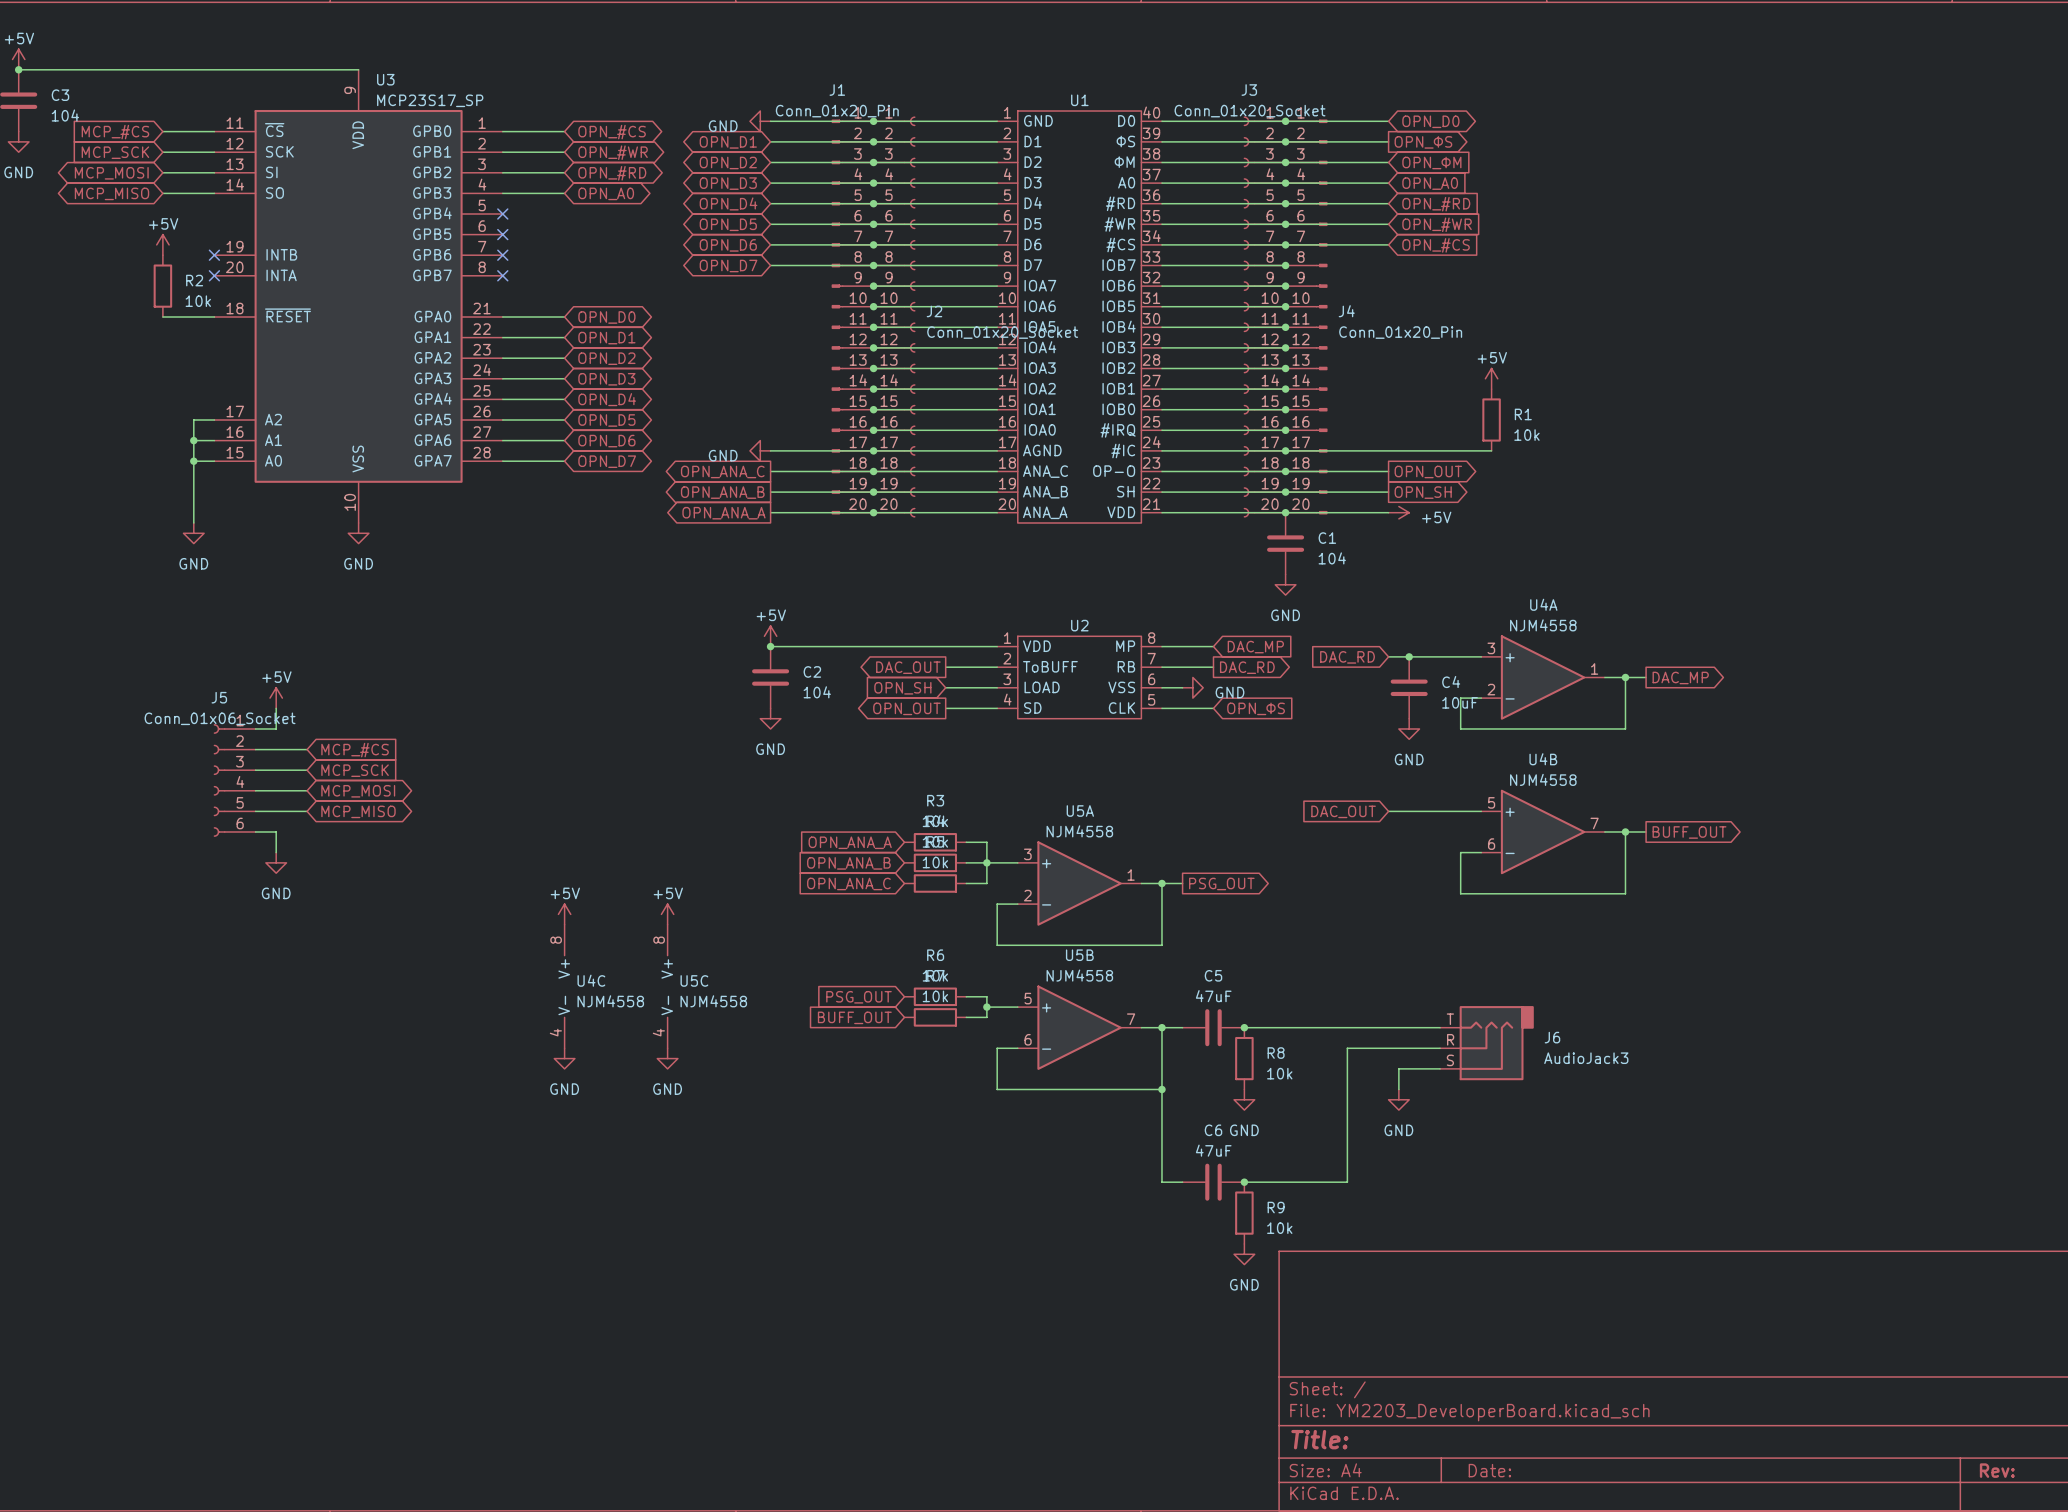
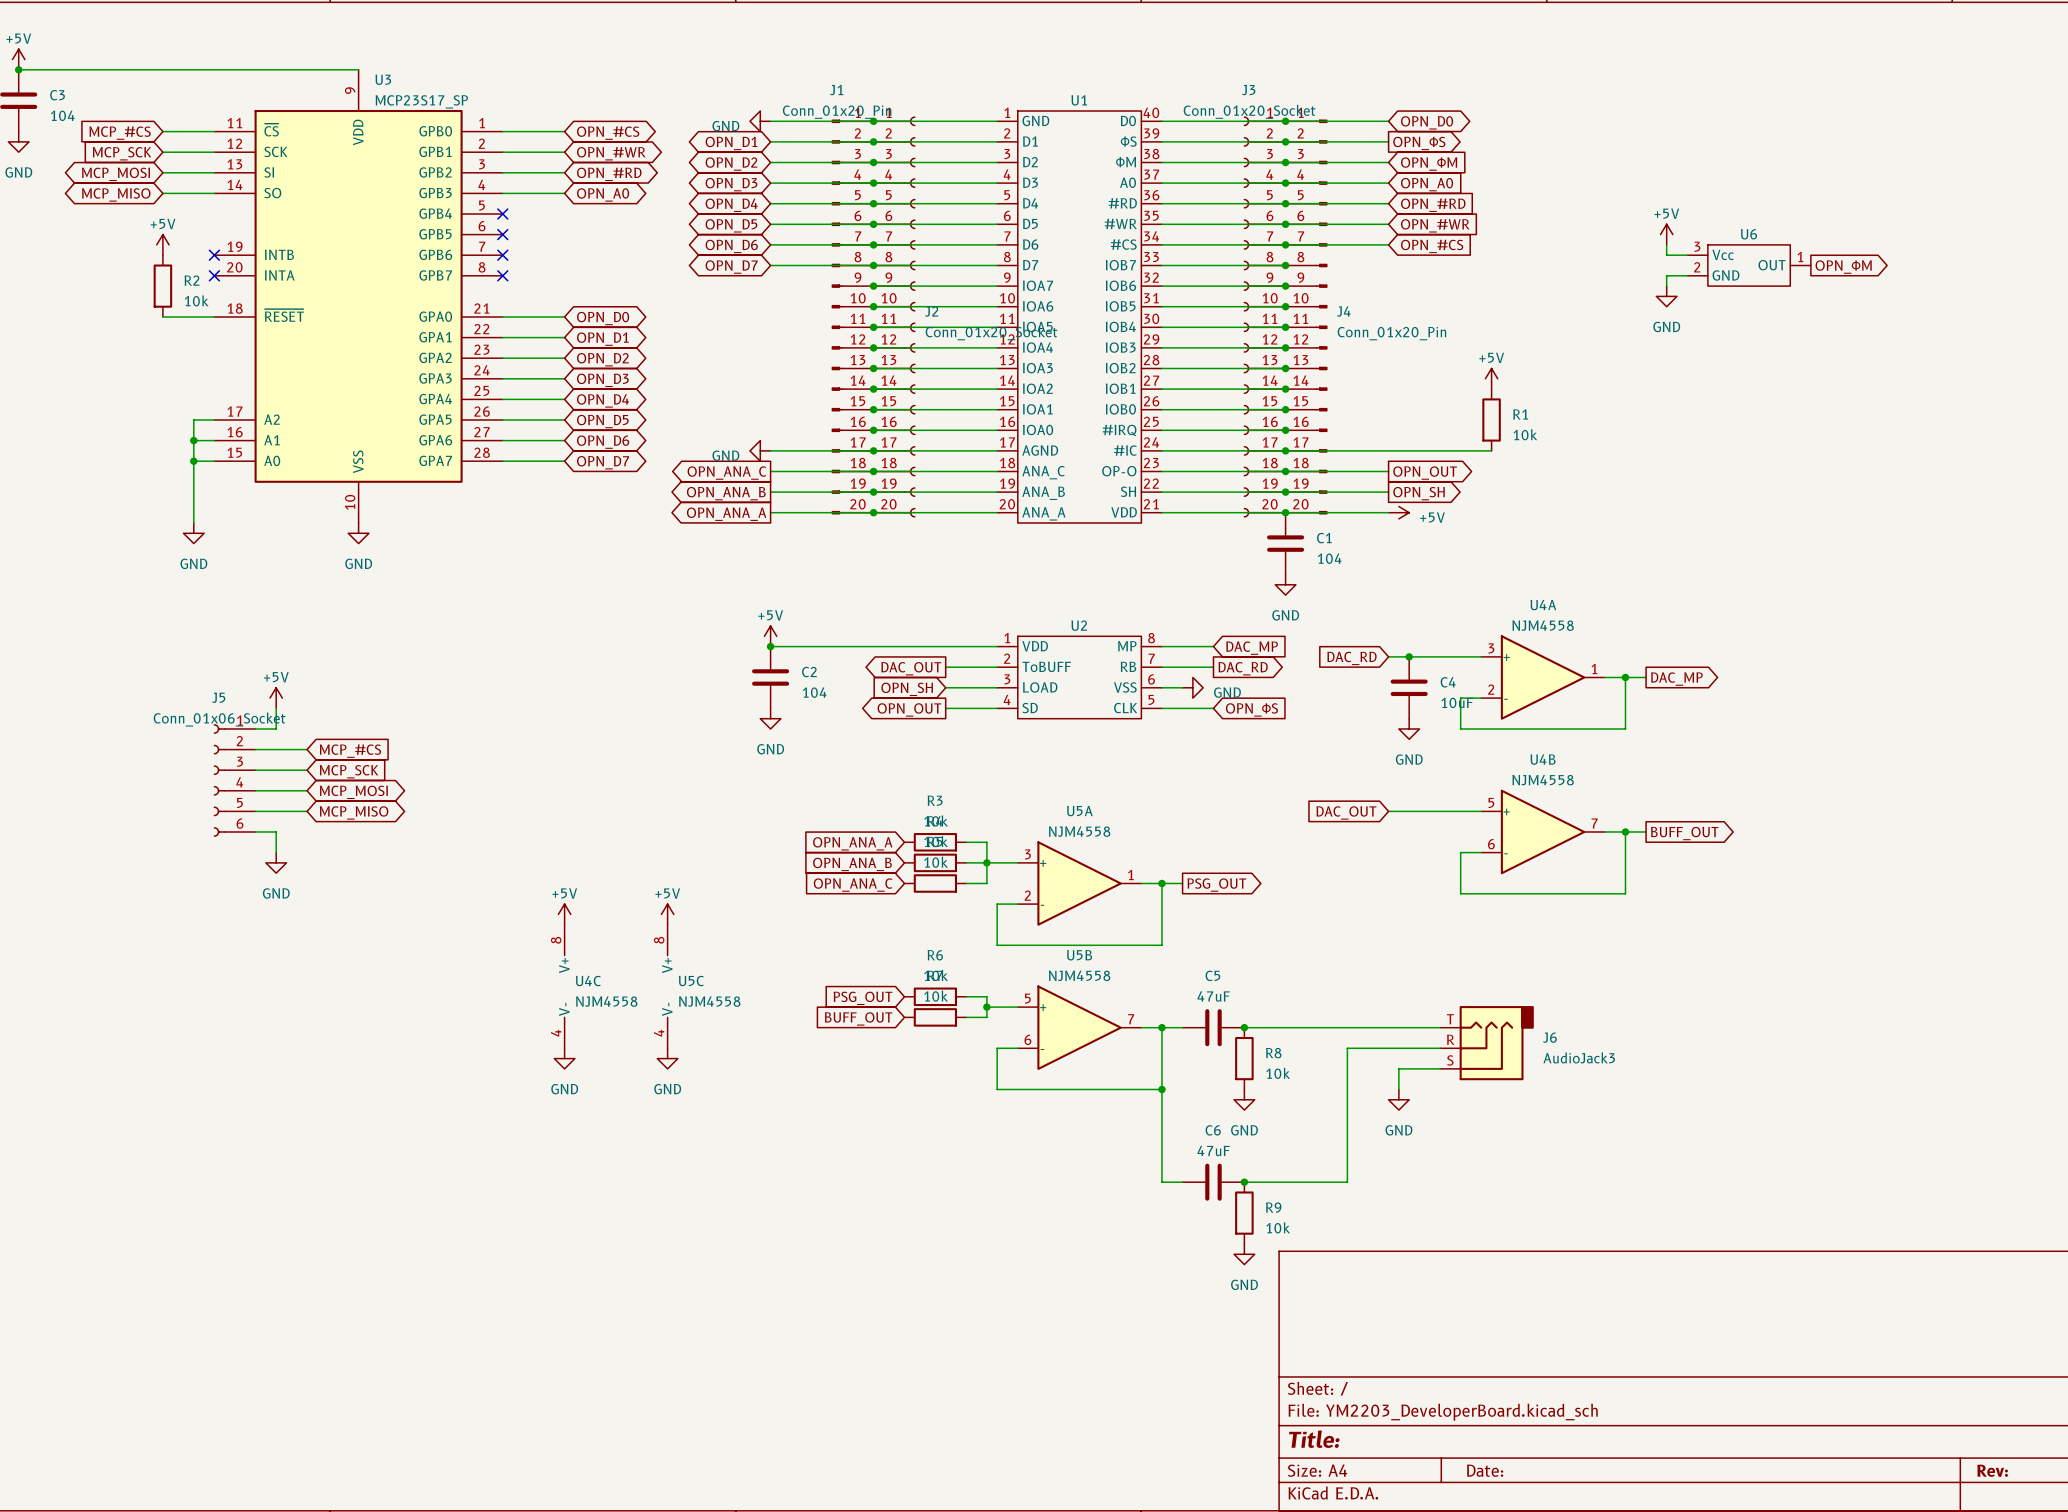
power symbol: none -> +5V (1666, 234)
wire: none -> (1666, 244) (1666, 255) (1687, 255)
U6: none -> (1749, 265)
global label: none -> OPN_ΦM (1843, 267)
wire: none -> (1687, 275) (1666, 275) (1666, 286)
power symbol: none -> GND (1666, 296)

